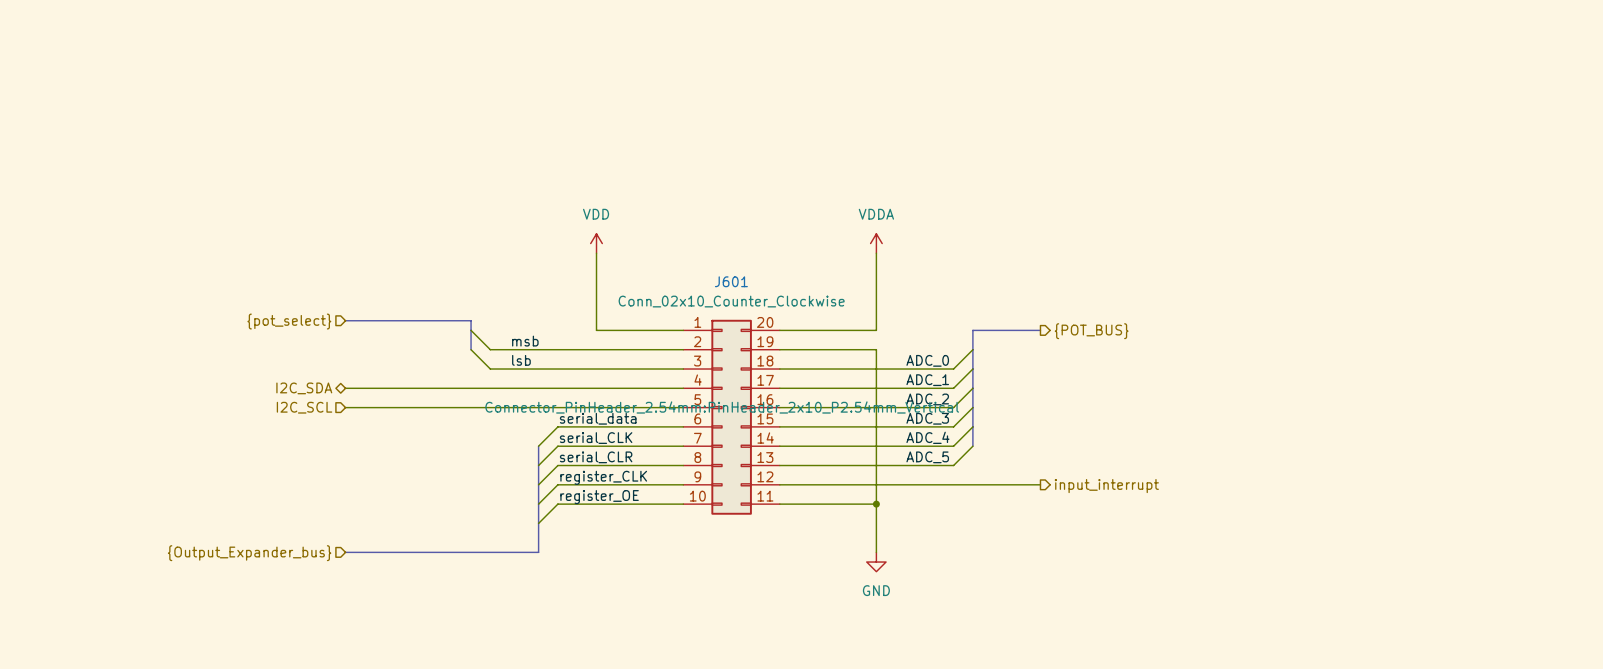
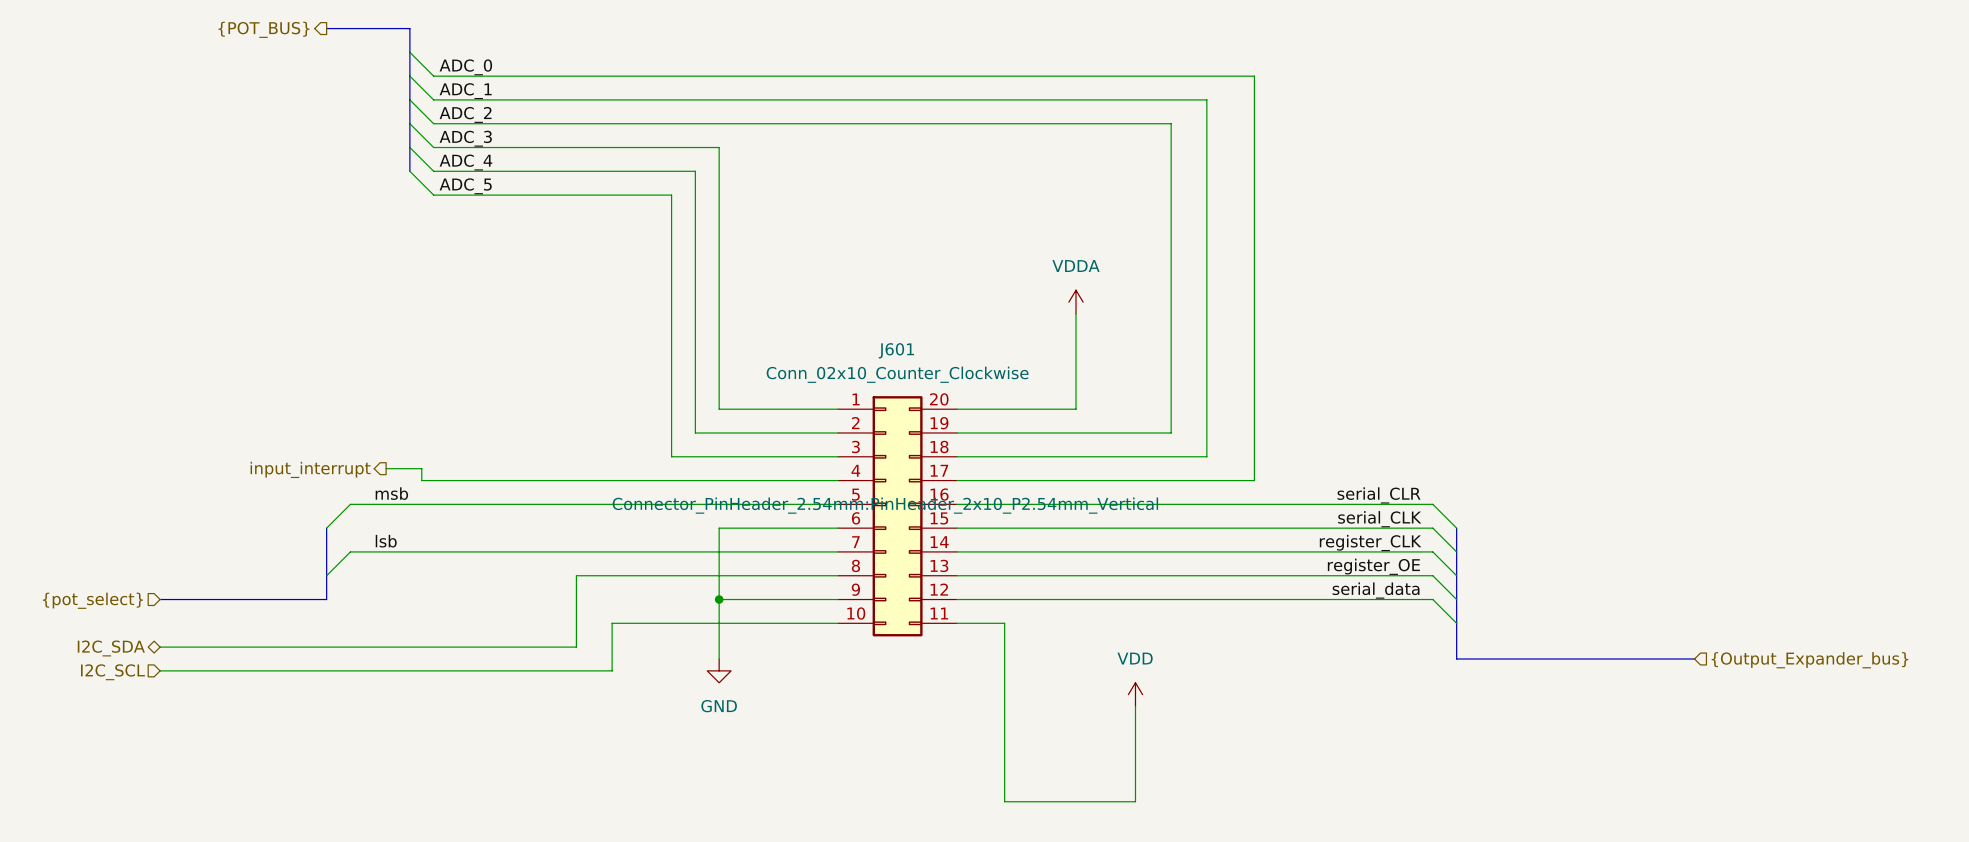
bus: none -> (326, 28) (409, 28) (409, 171)
hierarchical label: none -> {POT_BUS} (263, 29)
label: none -> ADC_0 (465, 67)
label: none -> ADC_1 (465, 91)
label: none -> ADC_2 (465, 114)
label: none -> ADC_3 (465, 138)
label: none -> ADC_4 (465, 162)
label: none -> ADC_5 (465, 186)
power symbol: VDD (596, 243) -> none
wire: (596, 253) (596, 330) -> (409, 123) (433, 147) (719, 147) (719, 409) (731, 409)
bus: (345, 320) (471, 320) (471, 349) -> none
hierarchical label: {pot_select} (289, 321) -> none
wire: (471, 330) (490, 349) (567, 349) -> (409, 147) (433, 171) (695, 171) (695, 432)
bus: (1040, 330) (972, 330) (972, 446) -> none
hierarchical label: {POT_BUS} (1091, 331) -> none
label: msb (525, 341) -> none
wire: (471, 349) (490, 369) (548, 369) -> (409, 171) (433, 195) (671, 195) (671, 456)
wire: (876, 349) (876, 552) -> (1076, 432) (1171, 432) (1171, 123) (433, 123) (409, 99)
wire: (972, 349) (953, 369) -> (409, 76) (433, 99) (1206, 99) (1206, 456) (1171, 456)
label: lsb (521, 360) -> none
label: ADC_0 (927, 360) -> none
wire: (972, 369) (953, 388) -> (409, 52) (433, 76) (1254, 76) (1254, 480) (1171, 480)
wire: none -> (386, 468) (421, 468) (421, 480)
hierarchical label: none -> input_interrupt (310, 469)
label: ADC_1 (927, 380) -> none
hierarchical label: I2C_SDA (304, 388) -> none
wire: (972, 388) (953, 407) -> (1456, 528) (1432, 504) (1171, 504)
label: none -> msb (391, 493)
label: ADC_2 (927, 399) -> none
label: none -> serial_CLR (1379, 495)
hierarchical label: I2C_SCL (304, 407) -> none
wire: none -> (421, 504) (350, 504) (326, 528)
wire: (972, 407) (953, 426) -> (1456, 551) (1432, 528) (1171, 528)
label: serial_data (598, 418) -> none
label: ADC_3 (927, 418) -> none
label: none -> serial_CLK (1379, 519)
bus: none -> (326, 528) (326, 599) (160, 599)
wire: (586, 426) (557, 426) (538, 446) -> (719, 528) (719, 659)
wire: (972, 426) (953, 446) -> (1456, 575) (1432, 551) (1171, 551)
bus: none -> (1456, 528) (1456, 659) (1694, 659)
label: none -> lsb (386, 541)
label: ADC_4 (927, 437) -> none
label: serial_CLK (596, 438) -> none
label: none -> register_CLK (1370, 543)
bus: (538, 446) (538, 552) (345, 552) -> none
wire: (557, 446) (538, 465) -> (683, 551) (350, 551) (326, 575)
wire: (972, 446) (953, 465) -> (1456, 599) (1432, 575) (1171, 575)
label: serial_CLR (596, 457) -> none
label: ADC_5 (927, 457) -> none
label: none -> register_OE (1373, 566)
wire: (557, 465) (538, 484) -> (683, 575) (576, 575) (576, 647) (160, 647)
label: none -> serial_data (1376, 590)
label: register_CLK (603, 477) -> none
wire: (586, 484) (557, 484) (538, 504) -> none
junction: none -> (719, 599)
wire: none -> (1278, 599) (1432, 599) (1456, 623)
hierarchical label: none -> {pot_select} (92, 600)
hierarchical label: input_interrupt (1106, 486) -> none
label: register_OE (599, 497) -> none
wire: (557, 504) (538, 523) -> (683, 623) (612, 623) (612, 670) (160, 670)
wire: (818, 504) (876, 504) -> (1004, 623) (1004, 801) (1135, 801) (1135, 706)
junction: (876, 504) -> none
hierarchical label: none -> I2C_SDA (111, 648)
hierarchical label: none -> {Output_Expander_bus} (1810, 660)
hierarchical label: none -> I2C_SCL (112, 672)
power symbol: none -> GND (719, 670)
hierarchical label: {Output_Expander_bus} (249, 553) -> none
power symbol: GND (876, 562) -> none
power symbol: none -> VDD (1135, 694)

